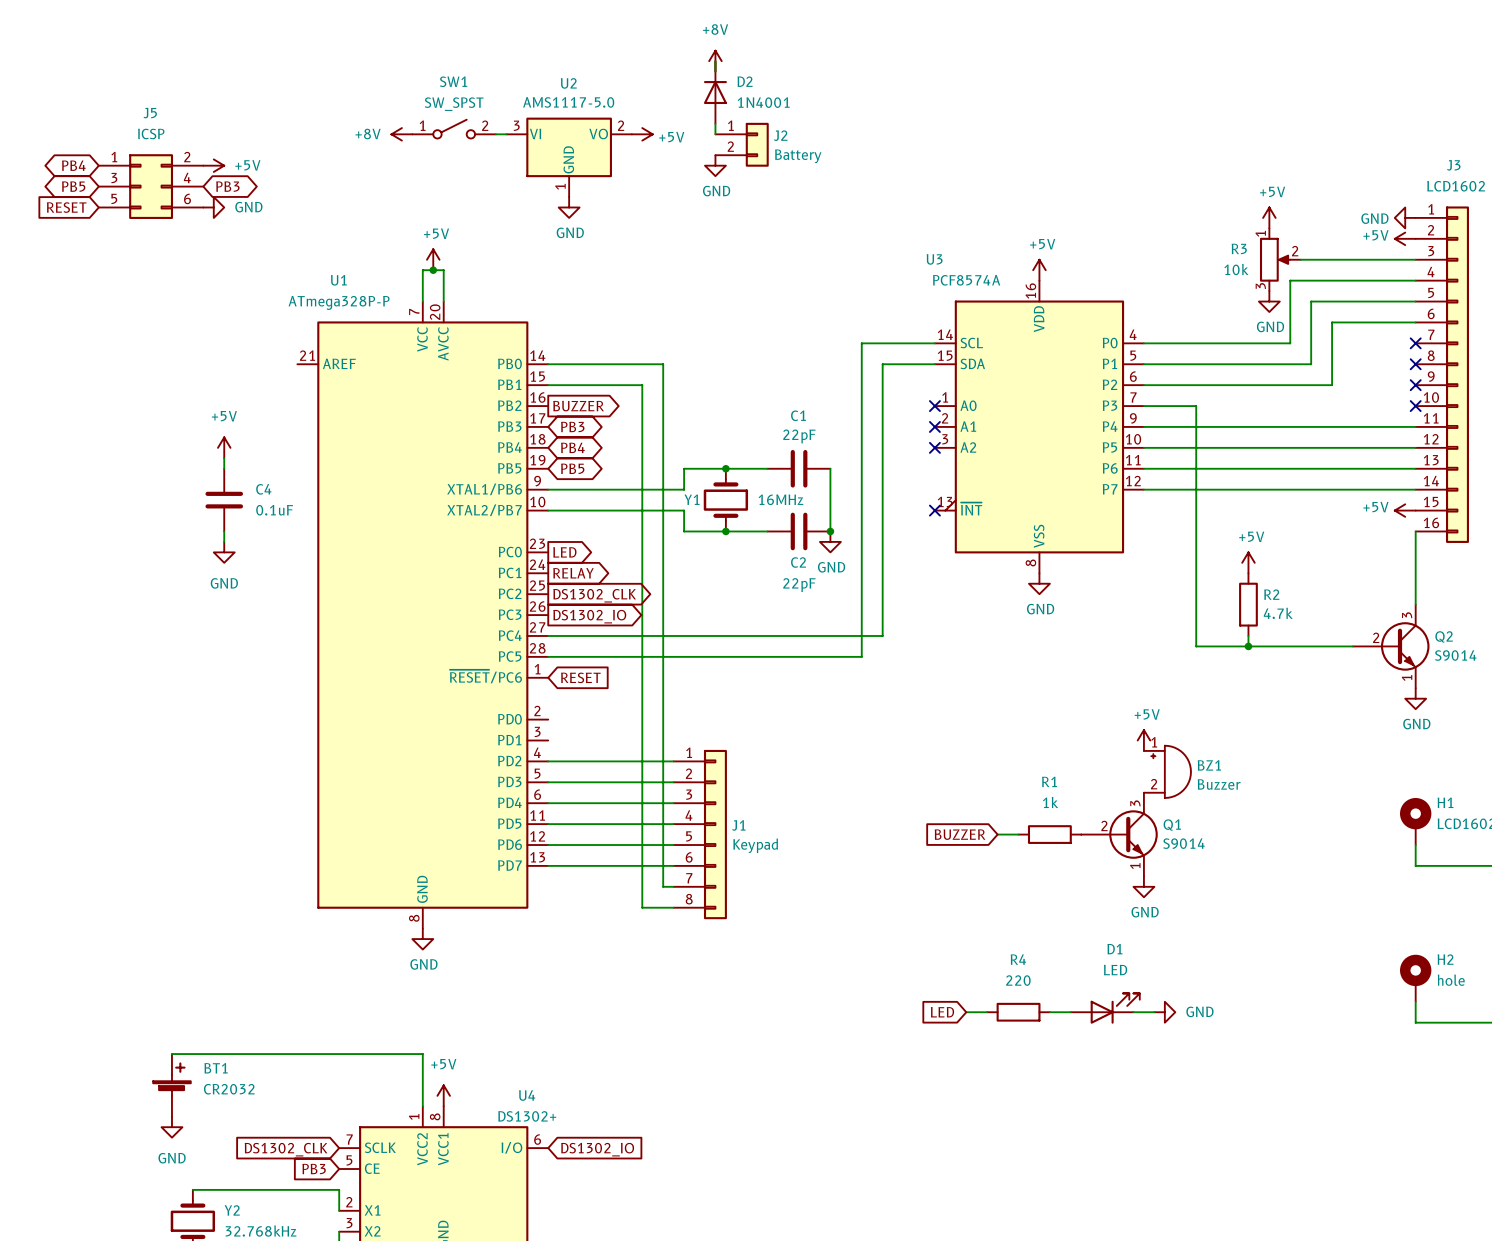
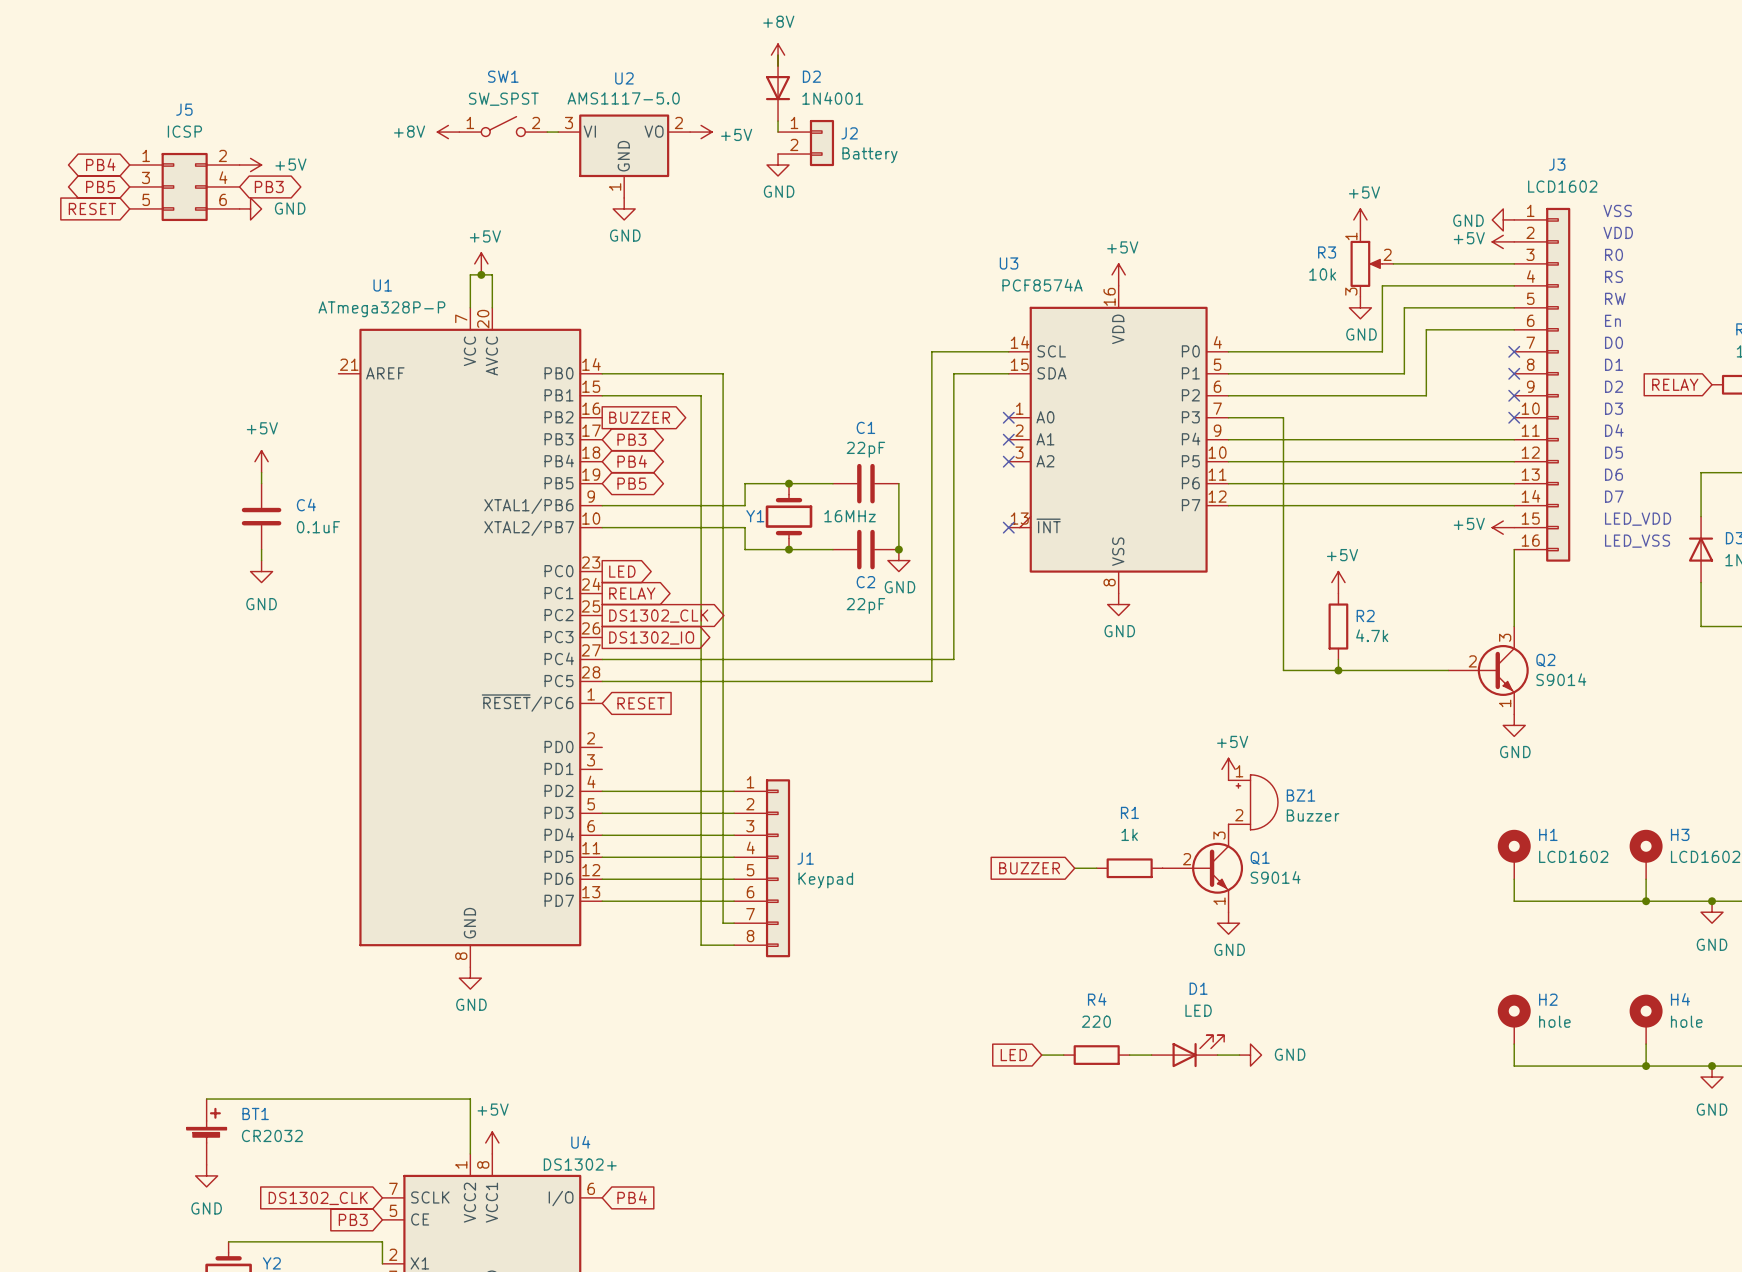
D2 rotation: 0° (715, 92) -> 180° (778, 88)
global label: DS1302_IO (597, 1149) -> PB4 (632, 1197)

